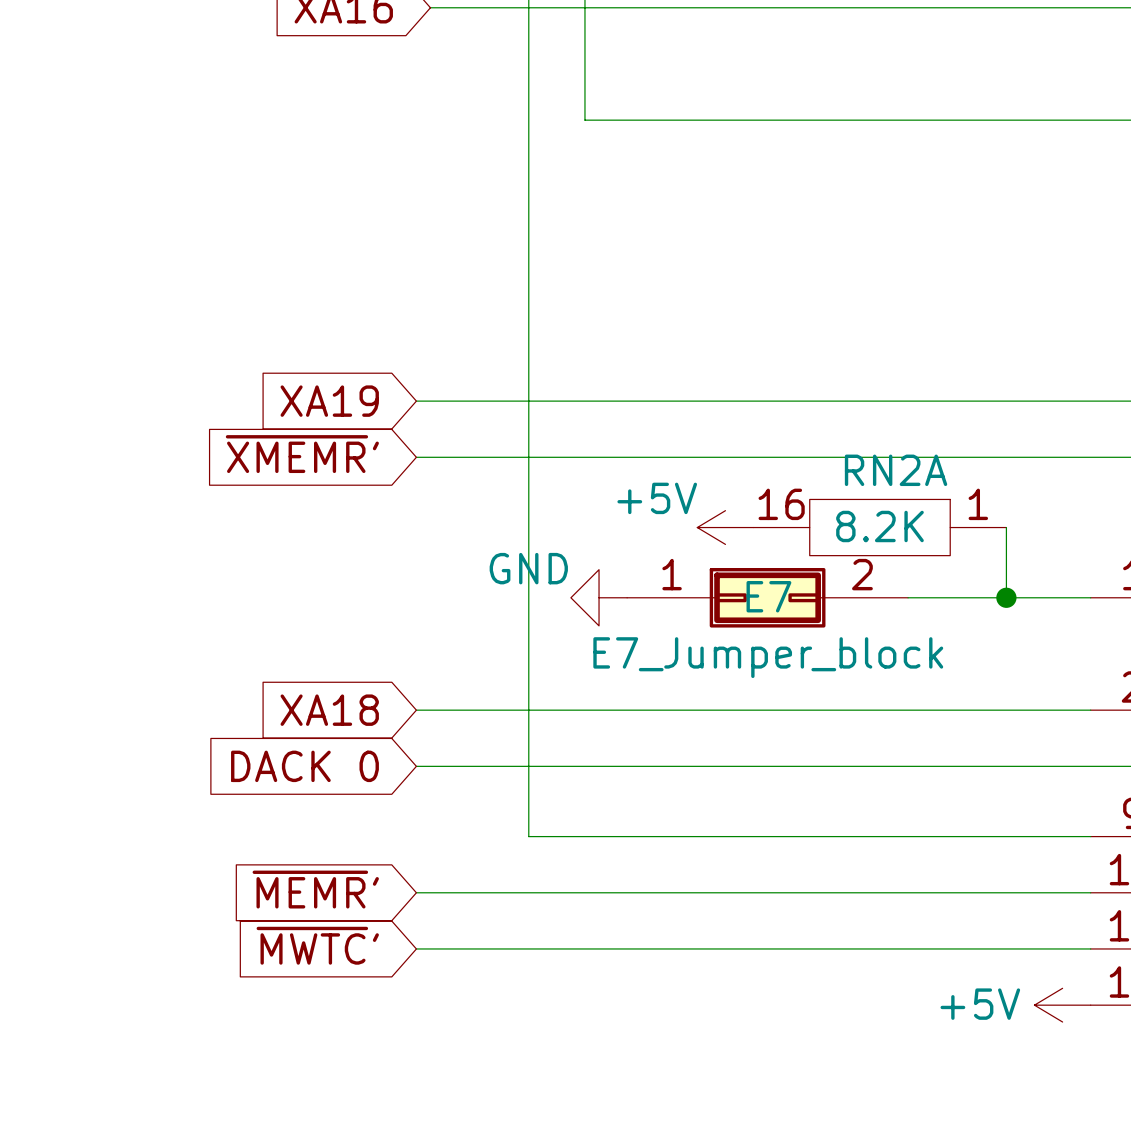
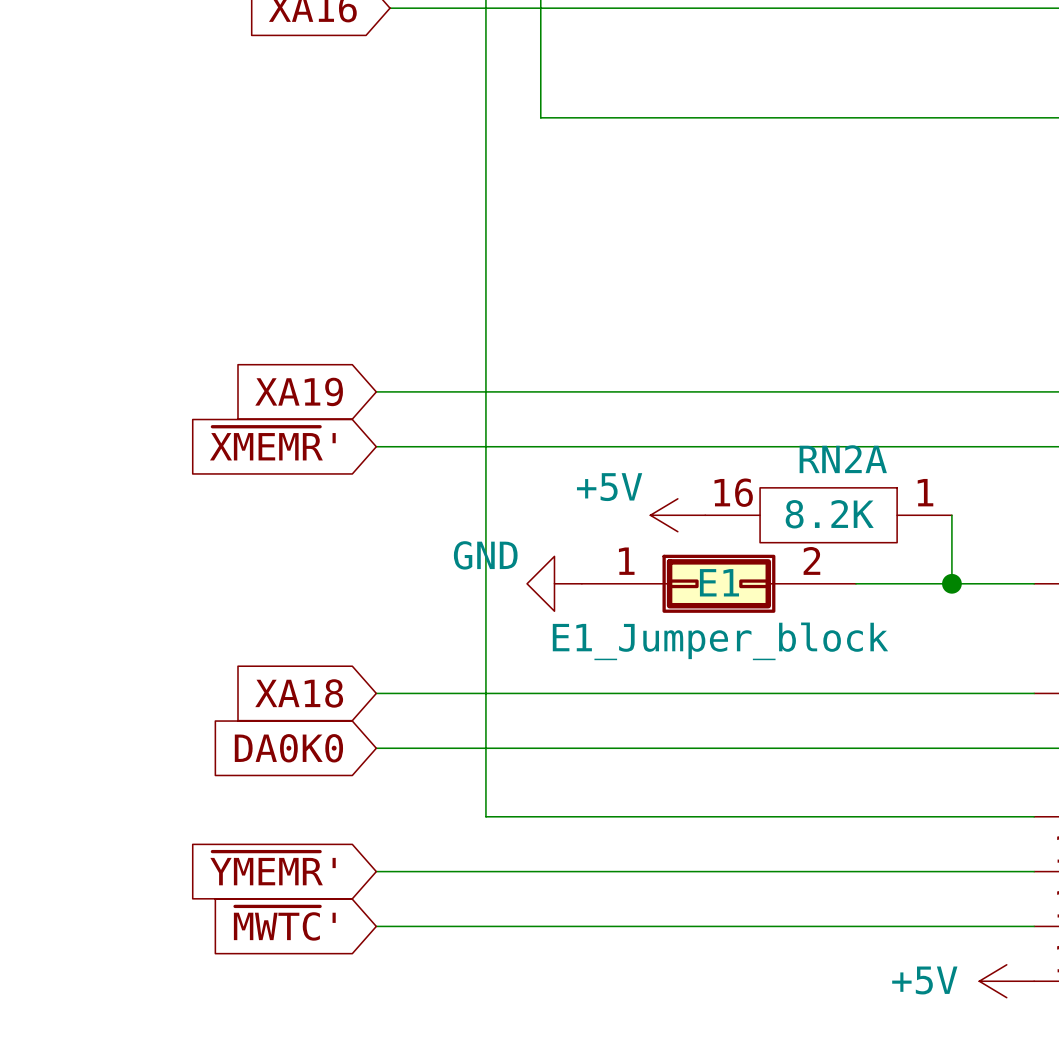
E7 name: E7 (768, 596) -> E1 (719, 582)
E7 value: E7_Jumper_block (768, 657) -> E1_Jumper_block (720, 641)
global label: DACK 0 (304, 766) -> DA0K0 (288, 748)
global label: ~{MEMR}' (315, 889) -> ~{YMEMR}' (273, 868)

